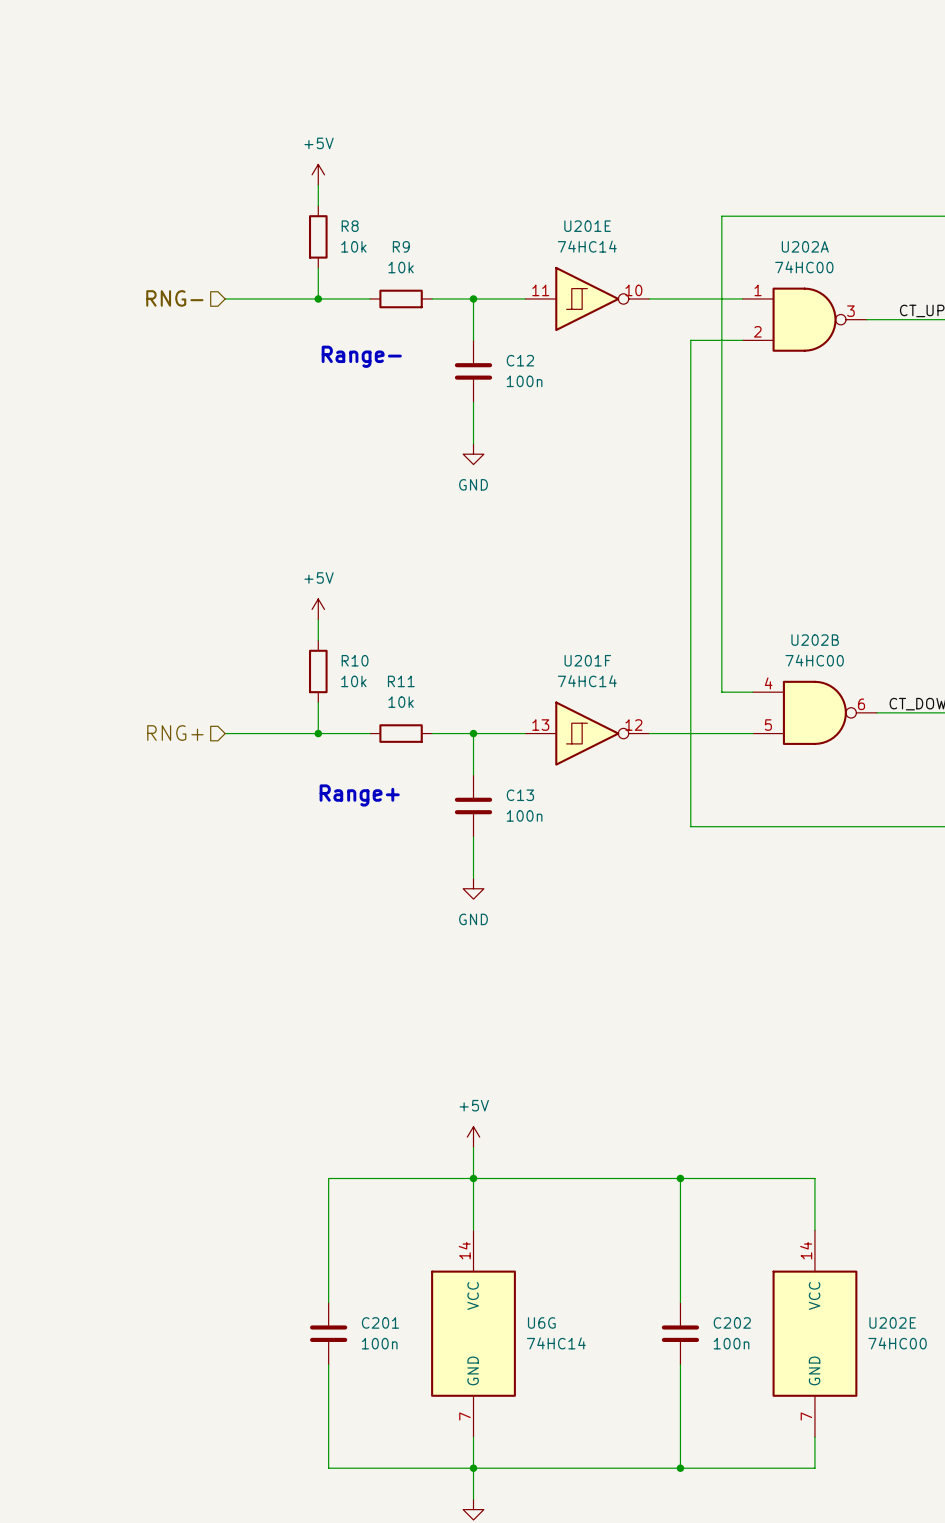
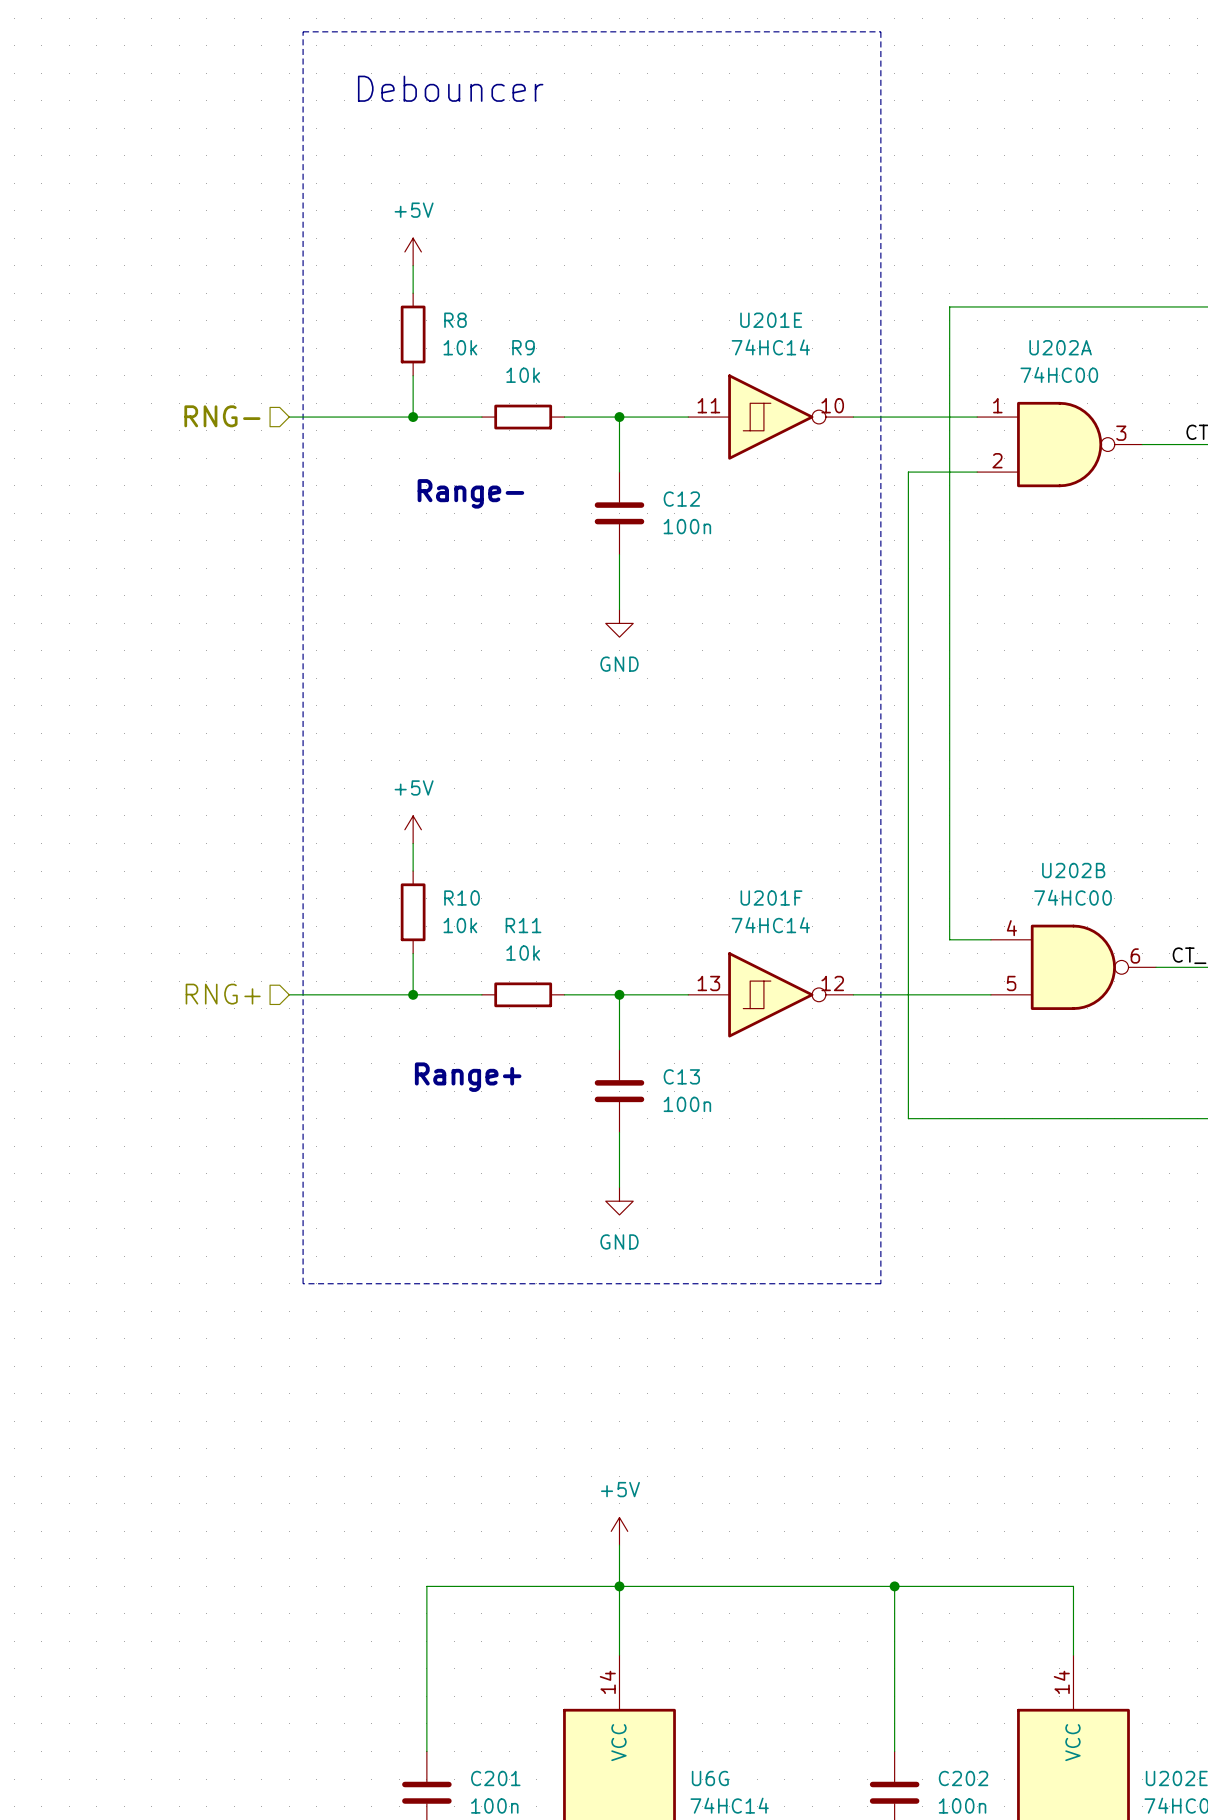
line: none -> (303, 31) (880, 31) (880, 1283) (303, 1283) (303, 31)
text: none -> Debouncer (450, 88)

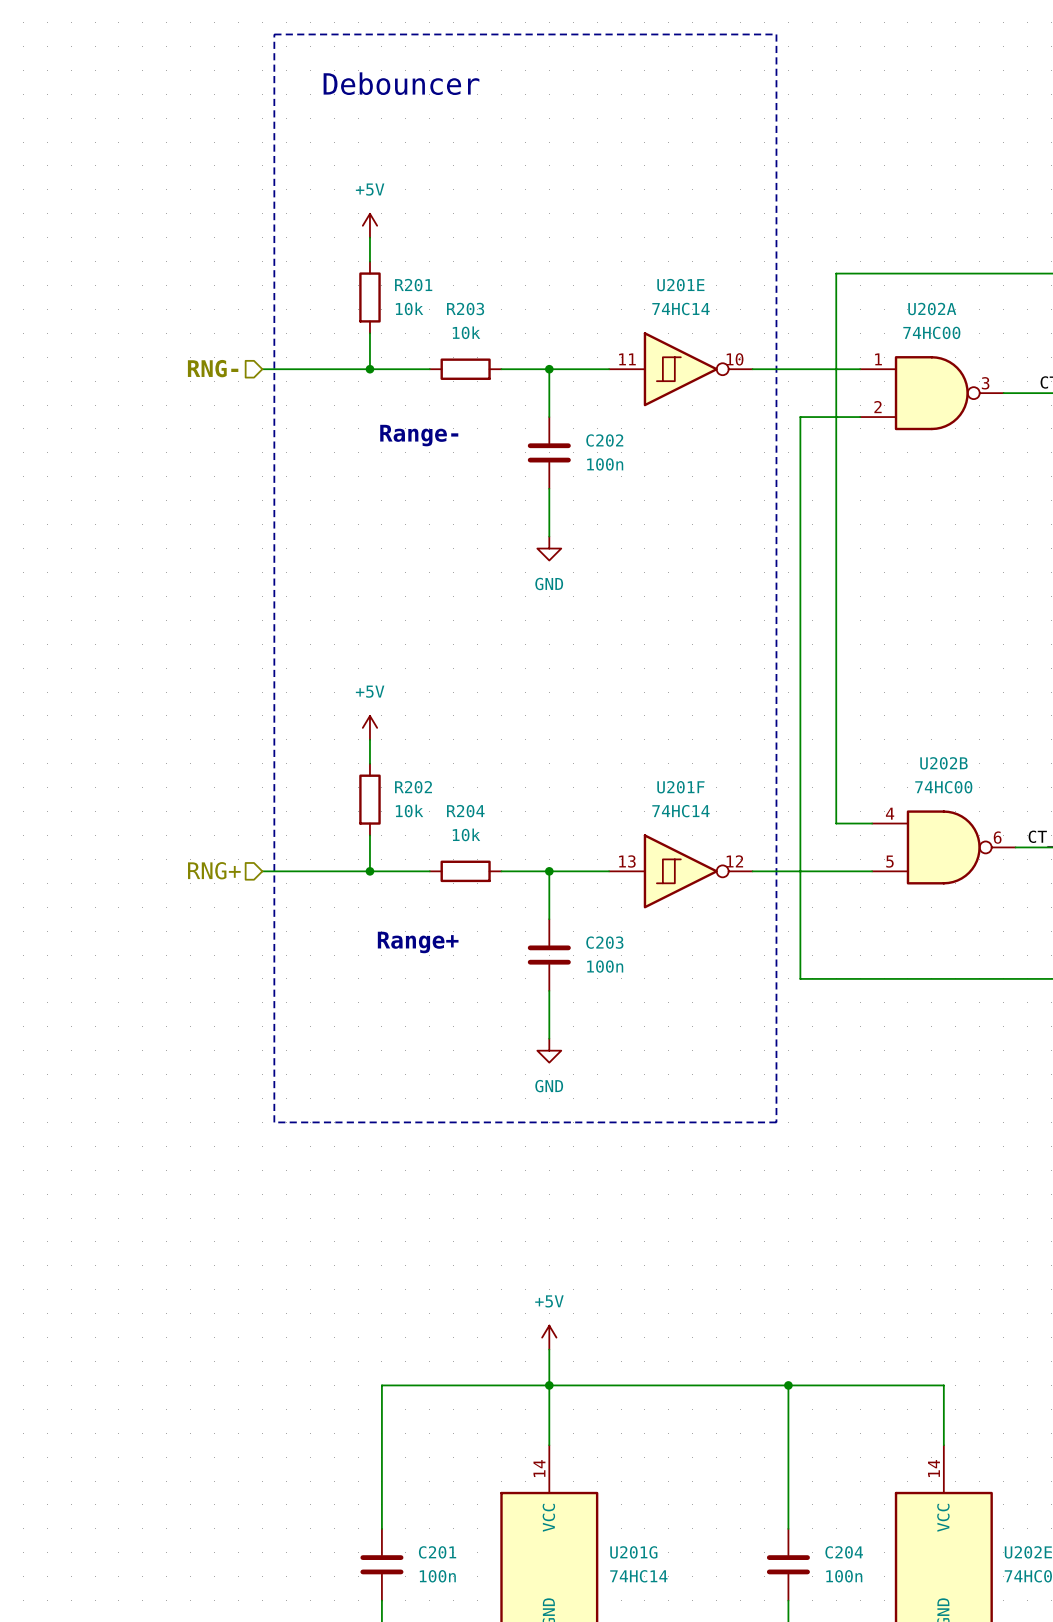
R8 name: R8 (455, 320) -> R201 (413, 285)
R9 name: R9 (523, 347) -> R203 (465, 309)
C12 name: C12 (681, 499) -> C202 (604, 440)
R10 name: R10 (462, 898) -> R202 (413, 787)
R11 name: R11 (523, 925) -> R204 (465, 811)
C13 name: C13 (681, 1076) -> C203 (604, 942)
U6G name: U6G (710, 1778) -> U201G (633, 1552)
C202 name: C202 (963, 1778) -> C204 (844, 1552)

